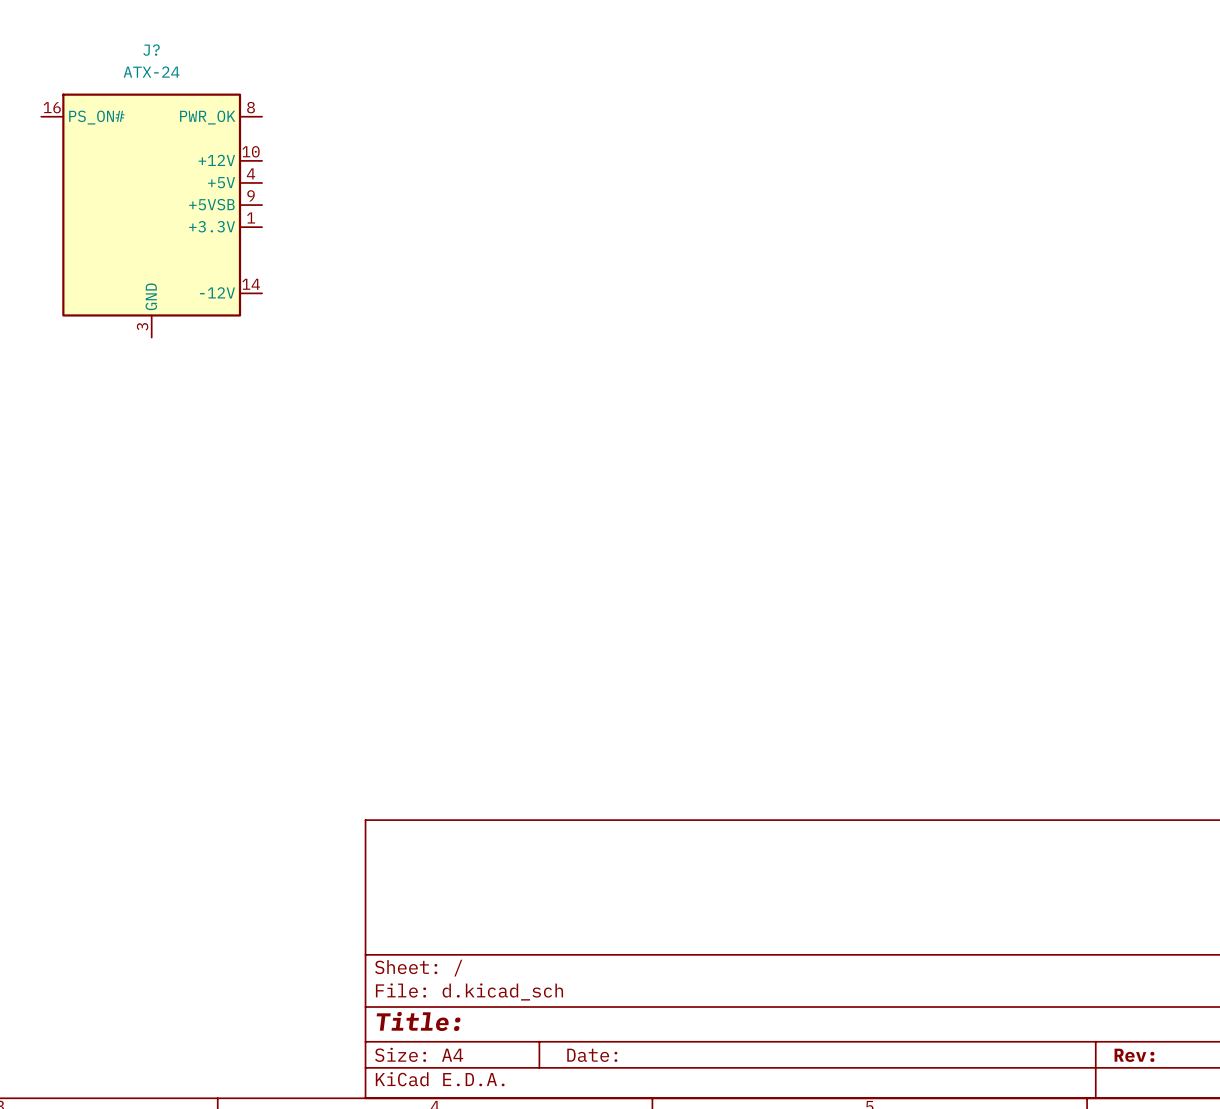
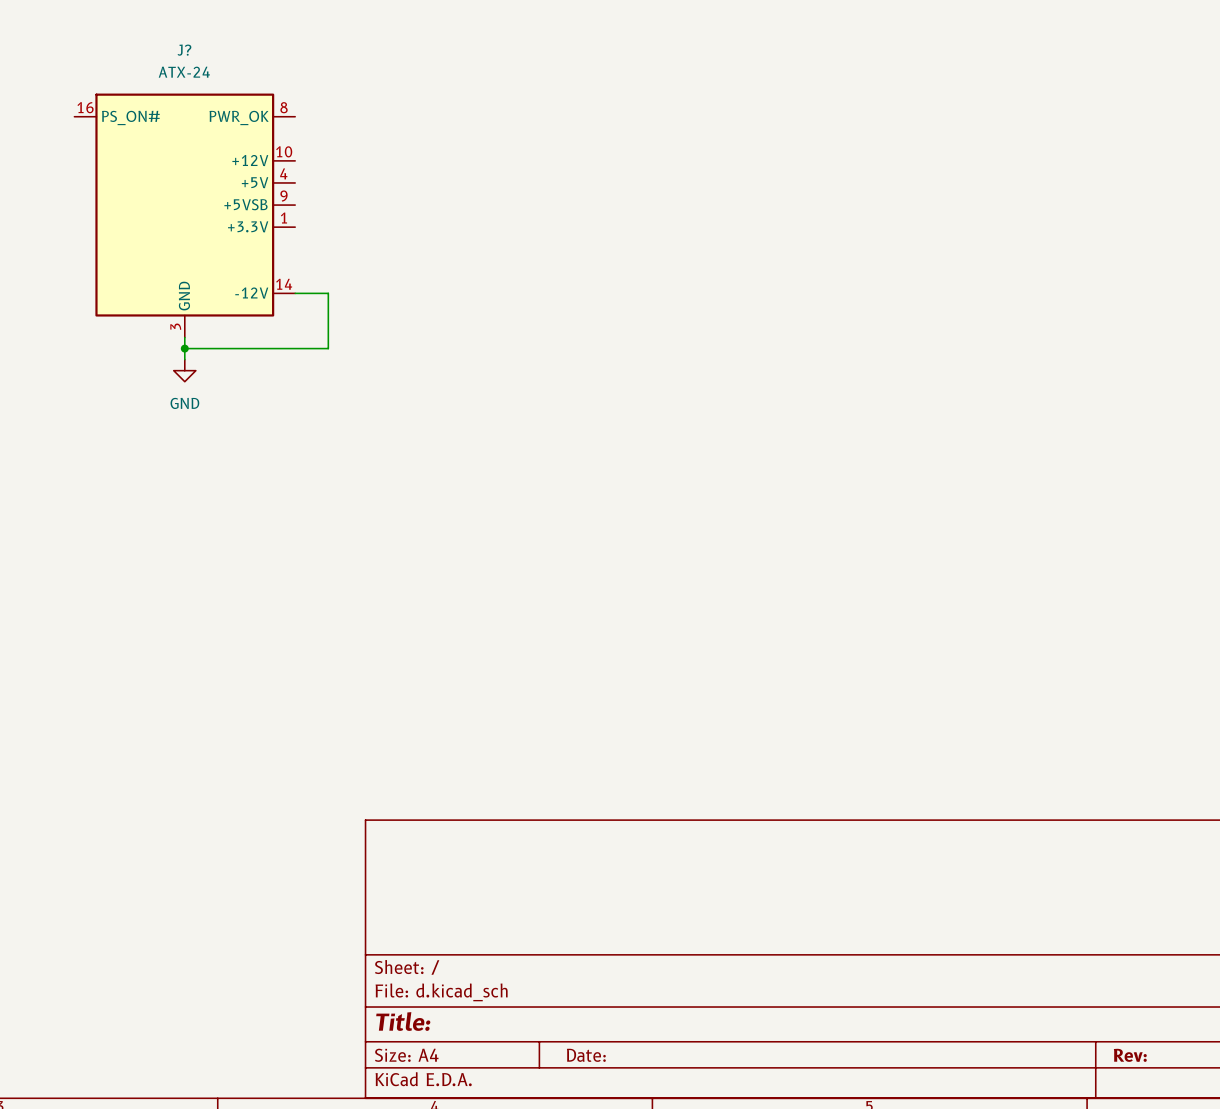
J? position: (151, 215) -> (184, 215)
wire: none -> (295, 293) (328, 293) (328, 348) (184, 348)
wire: none -> (184, 337) (184, 359)
junction: none -> (184, 348)
power symbol: none -> GND (184, 370)

